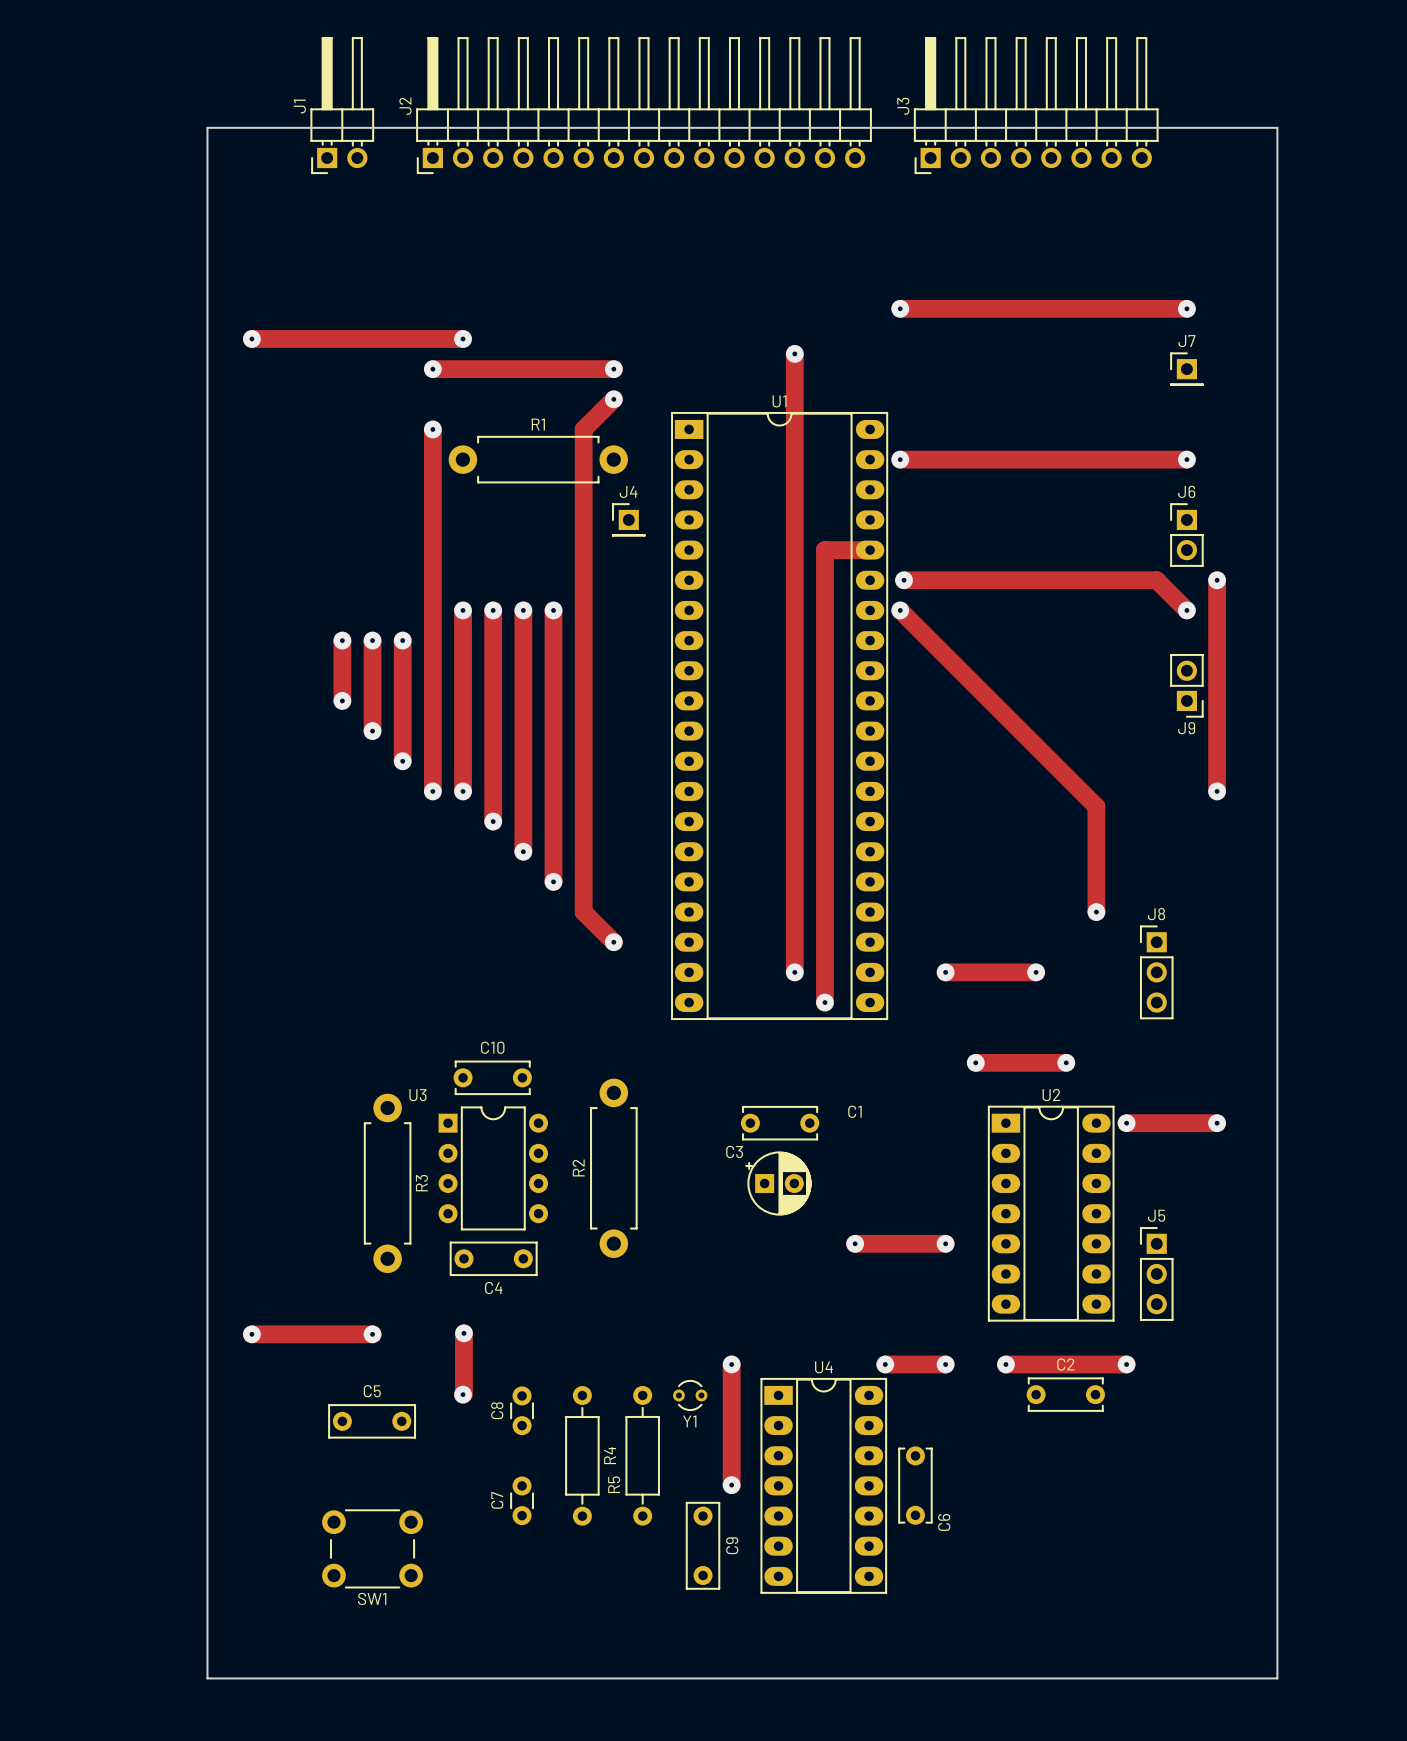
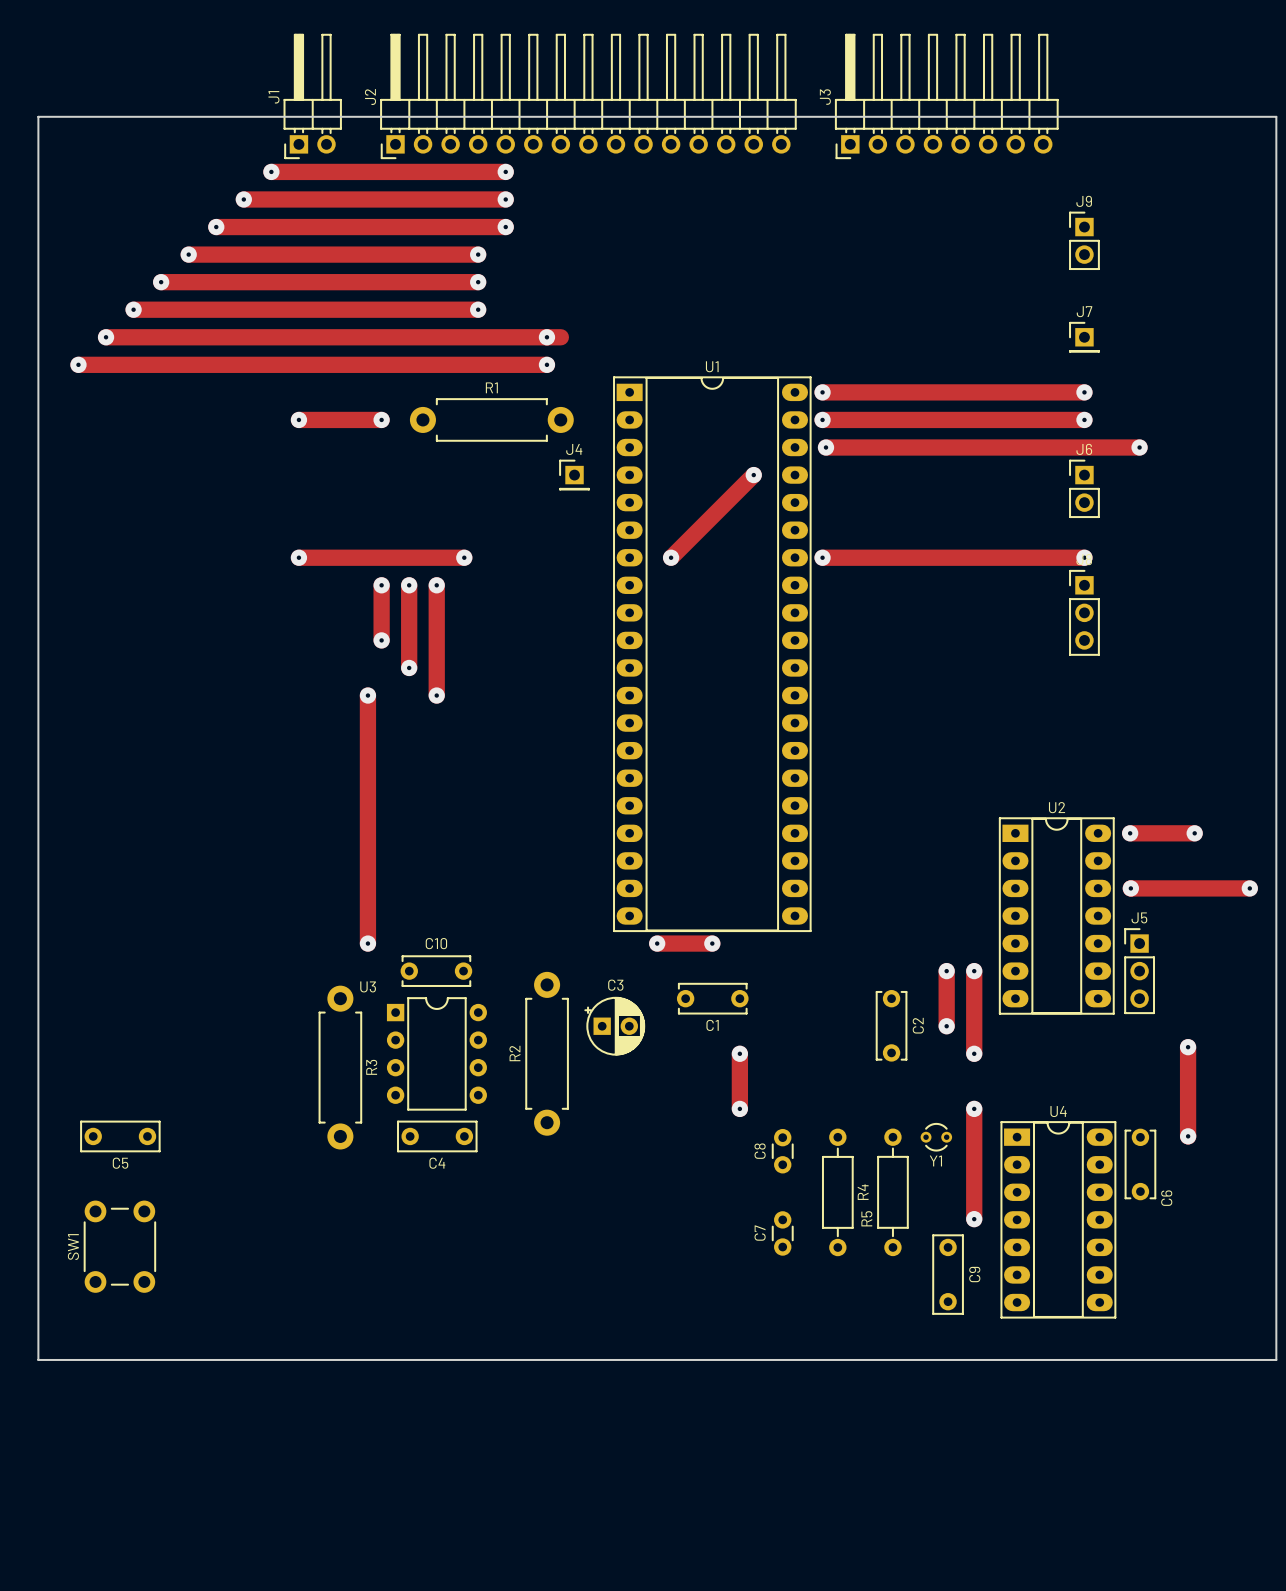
board edge: (207, 127) (207, 1678) (1277, 1678) (1277, 127) -> (189, 116) (38, 116) (38, 1359) (1276, 1359) (1276, 116) (1167, 116)
track: none -> (271, 171) (505, 171)
via: none -> (271, 171)
via: none -> (505, 171)
track: none -> (243, 199) (505, 199)
via: none -> (243, 199)
via: none -> (505, 199)
track: none -> (216, 227) (505, 227)
via: none -> (216, 227)
via: none -> (505, 227)
track: none -> (188, 254) (478, 254)
via: none -> (188, 254)
via: none -> (478, 254)
track: none -> (161, 282) (478, 282)
via: none -> (161, 282)
via: none -> (478, 282)
track: (900, 308) (1186, 308) -> (822, 392) (1084, 392)
via: (900, 308) -> none
via: (1186, 308) -> none
track: none -> (133, 309) (230, 309)
via: none -> (133, 309)
via: (251, 338) -> none
track: none -> (423, 309) (478, 309)
via: (463, 338) -> none
via: none -> (478, 309)
track: (794, 353) (794, 972) -> none
via: (794, 353) -> none
track: none -> (106, 337) (395, 337)
via: none -> (106, 337)
via: (432, 369) -> none
via position: (613, 369) -> (546, 337)
track: none -> (78, 364) (546, 364)
via: none -> (78, 364)
track: (613, 399) (583, 429) (583, 912) (613, 942) -> none
via position: (613, 399) -> (546, 364)
track: (432, 429) (432, 791) -> none
via position: (432, 429) -> (381, 419)
via: none -> (822, 392)
via: none -> (1084, 392)
track: none -> (298, 419) (381, 419)
via: none -> (298, 419)
track: none -> (826, 447) (1139, 447)
via: none -> (826, 447)
via: none -> (1139, 447)
track: none -> (753, 475) (671, 557)
via: none -> (753, 475)
track: (870, 550) (824, 550) (824, 1002) -> none
track: (904, 580) (1156, 580) (1186, 610) -> (822, 557) (1084, 557)
via: (904, 580) -> none
track: (1217, 580) (1217, 791) -> none
via: (1217, 580) -> none
track: none -> (298, 557) (464, 557)
via: none -> (298, 557)
track: (463, 610) (463, 791) -> none
via: (463, 610) -> none
track: (493, 610) (493, 821) -> none
via: (493, 610) -> none
via: none -> (464, 557)
track: (523, 610) (523, 851) -> none
via: (523, 610) -> none
track: (553, 610) (553, 881) -> none
via: (553, 610) -> none
via: none -> (671, 557)
track: (900, 610) (1096, 806) (1096, 912) -> none
track: (342, 640) (342, 700) -> (381, 585) (381, 640)
via: (342, 640) -> none
track: (372, 640) (372, 731) -> (409, 585) (409, 667)
via: (372, 640) -> none
track: (402, 640) (402, 761) -> (367, 943) (367, 695)
via position: (402, 640) -> (381, 585)
via: none -> (409, 585)
track: none -> (436, 585) (436, 695)
via: none -> (436, 585)
J9 rotation: 0° (1186, 685) -> 180° (1084, 240)
J9 position: (1186, 685) -> (1084, 240)
via: (342, 700) -> none
via: none -> (381, 640)
via: (372, 731) -> none
via: none -> (409, 667)
via: none -> (436, 695)
via: (432, 791) -> none
via: (463, 791) -> none
via: (1217, 791) -> none
via: (493, 821) -> none
via: (523, 851) -> none
via: (553, 881) -> none
via: (1096, 912) -> none
track: none -> (1130, 833) (1194, 833)
via: none -> (1130, 833)
via: none -> (1194, 833)
via: (613, 942) -> none
via: (794, 972) -> none
track: (945, 972) (1036, 972) -> none
via: (945, 972) -> none
via: (1036, 972) -> none
J8 position: (1156, 972) -> (1084, 612)
track: none -> (1130, 888) (1249, 888)
via: none -> (1130, 888)
via: none -> (1249, 888)
via: (824, 1002) -> none
via: none -> (367, 943)
track: none -> (657, 943) (712, 943)
via: none -> (657, 943)
via: none -> (712, 943)
track: (975, 1062) (1066, 1062) -> (974, 1053) (974, 971)
via: (975, 1062) -> none
track: none -> (946, 971) (946, 1026)
via: none -> (946, 971)
C10 position: (492, 1077) -> (436, 971)
C1 name position: C1 (854, 1111) -> C1 (712, 1025)
C1 position: (780, 1123) -> (712, 998)
via: none -> (946, 1026)
track: (1126, 1123) (1217, 1123) -> none
via: (1126, 1123) -> none
via: (1217, 1123) -> none
track: none -> (1188, 1047) (1188, 1136)
via: none -> (1188, 1047)
C3 name position: C3 (734, 1151) -> C3 (615, 985)
track: none -> (739, 1053) (739, 1108)
via: none -> (739, 1053)
via: none -> (974, 1053)
U3 position: (493, 1168) -> (436, 1053)
R2 position: (613, 1168) -> (547, 1053)
R3 position: (387, 1183) -> (340, 1067)
C3 position: (778, 1183) -> (614, 1026)
via: none -> (739, 1108)
U2 position: (1051, 1213) -> (1056, 916)
track: none -> (974, 1108) (974, 1219)
via: none -> (974, 1108)
track: (855, 1243) (945, 1243) -> none
via: (855, 1243) -> none
via: (945, 1243) -> none
via: none -> (1188, 1136)
C4 position: (493, 1258) -> (437, 1136)
J5 position: (1156, 1273) -> (1139, 971)
track: (463, 1333) (463, 1394) -> none
via: (463, 1333) -> none
track: (251, 1334) (372, 1334) -> none
via: (251, 1334) -> none
via: (372, 1334) -> none
via: none -> (974, 1219)
track: (731, 1364) (731, 1485) -> none
via: (731, 1364) -> none
track: (885, 1364) (945, 1364) -> none
via: (885, 1364) -> none
via: (945, 1364) -> none
track: (1005, 1364) (1126, 1364) -> none
via: (1005, 1364) -> none
via: (1126, 1364) -> none
C5 name position: C5 (372, 1391) -> C5 (120, 1163)
via: (463, 1394) -> none
C2 rotation: 0° (1065, 1394) -> 90° clockwise (891, 1025)
C2 position: (1065, 1394) -> (891, 1025)
Y1 position: (690, 1395) -> (936, 1137)
C8 position: (522, 1410) -> (782, 1151)
C5 position: (372, 1421) -> (120, 1136)
R4 position: (582, 1455) -> (837, 1192)
R5 position: (642, 1455) -> (892, 1192)
via: (731, 1485) -> none
U4 position: (823, 1485) -> (1058, 1219)
C6 position: (915, 1485) -> (1140, 1164)
C7 position: (522, 1500) -> (782, 1233)
C9 position: (703, 1545) -> (948, 1274)
SW1 rotation: 0° (372, 1548) -> 90° clockwise (119, 1246)
SW1 position: (372, 1548) -> (119, 1246)

